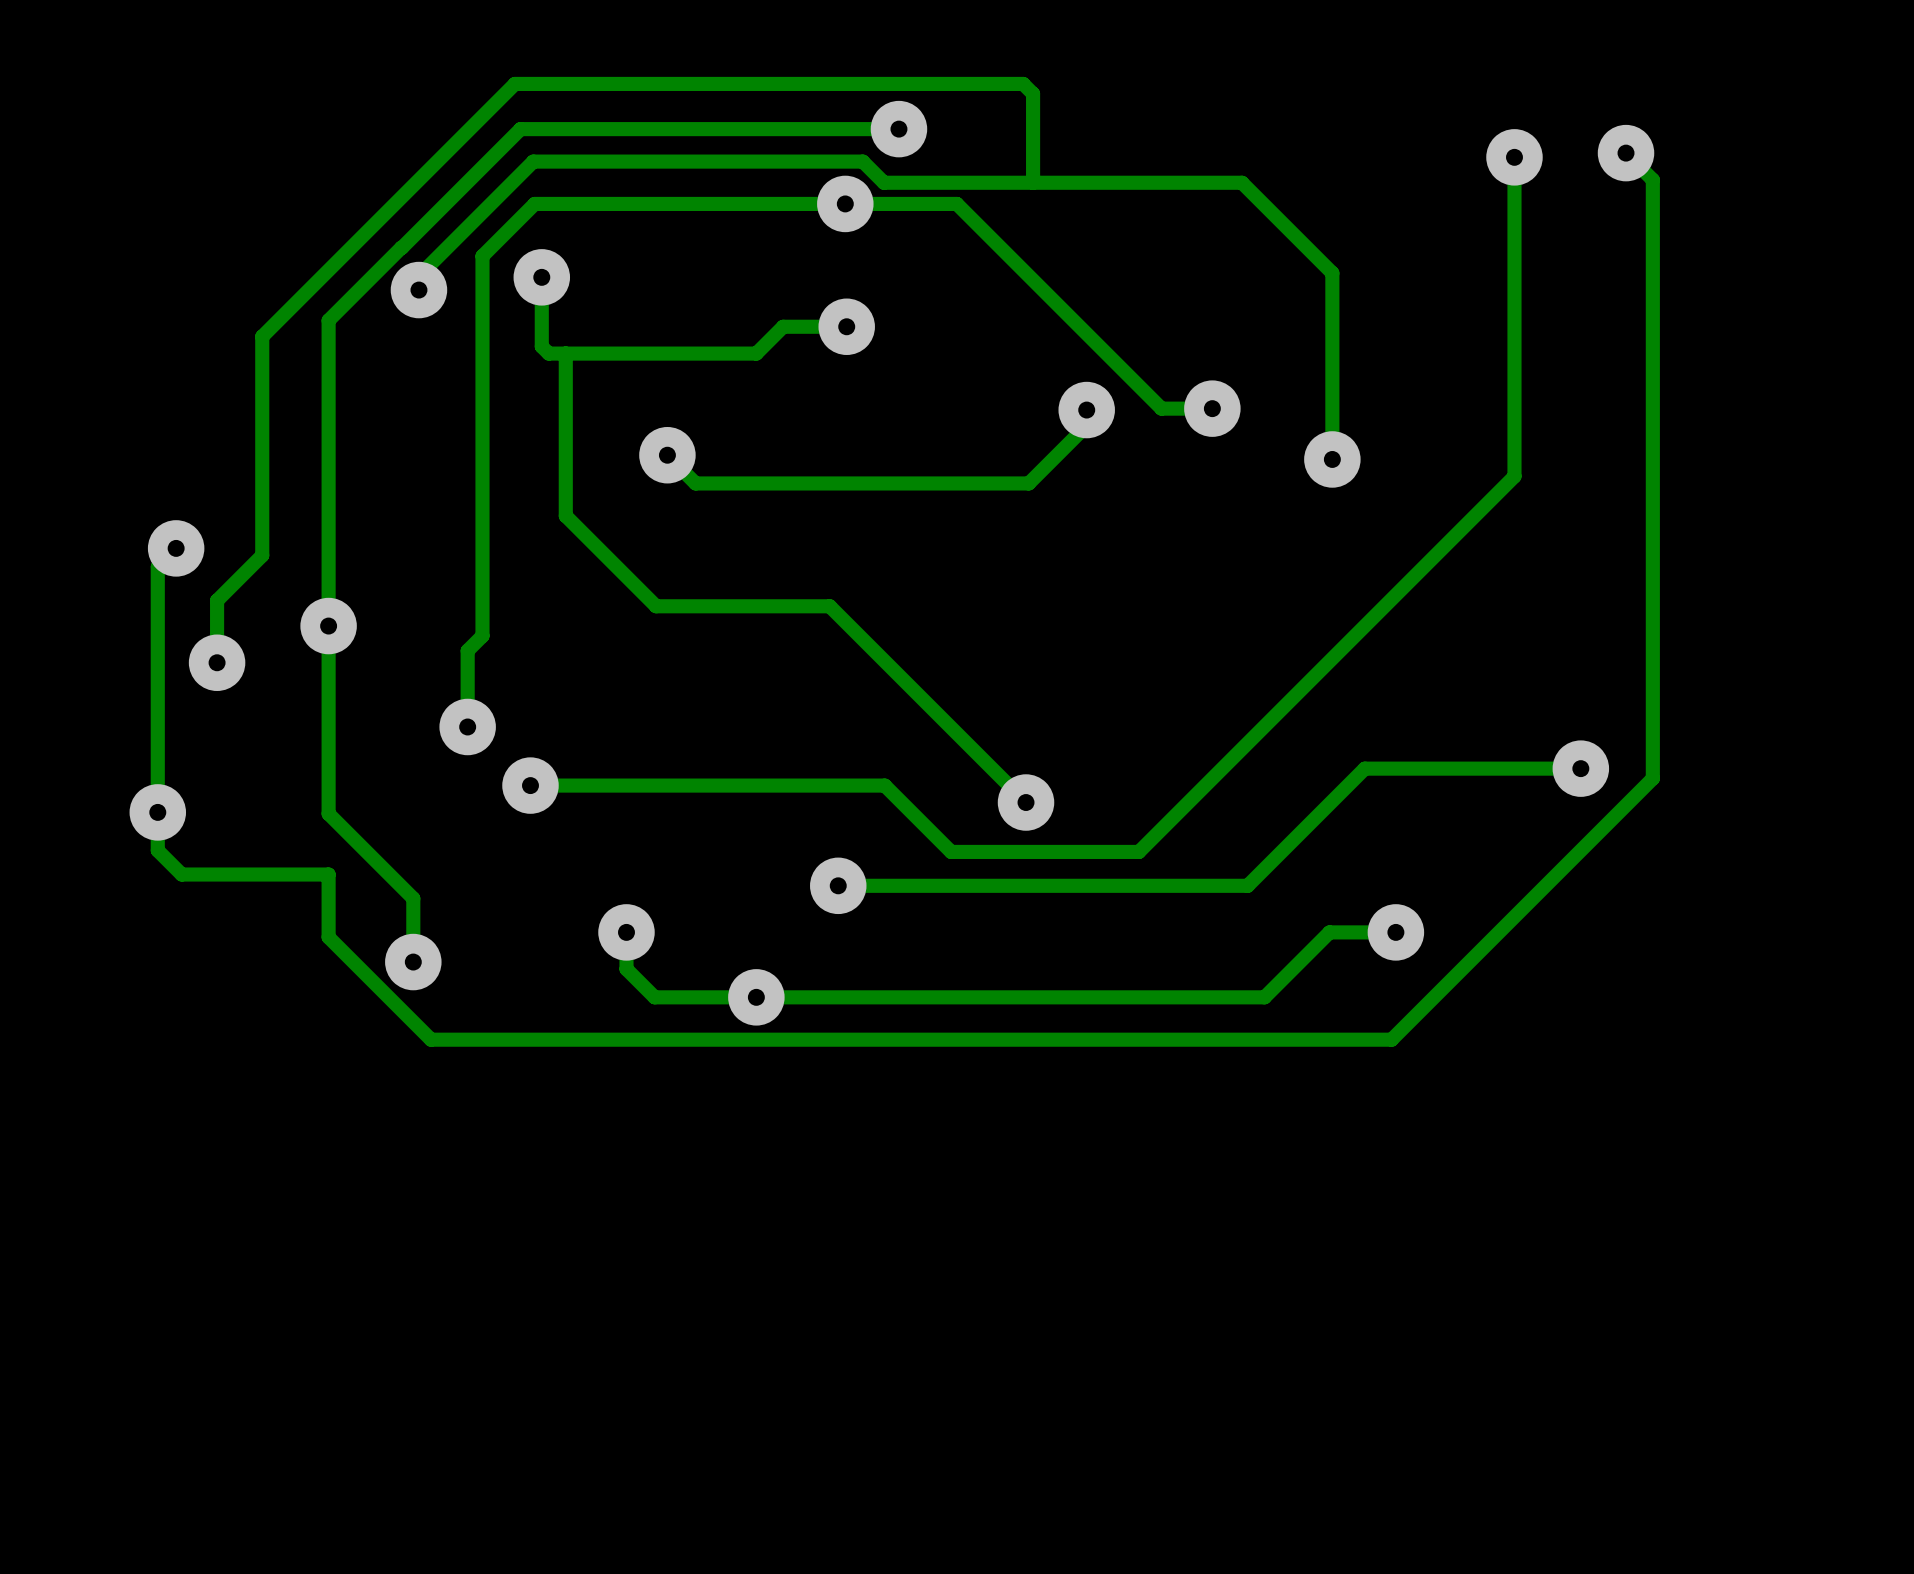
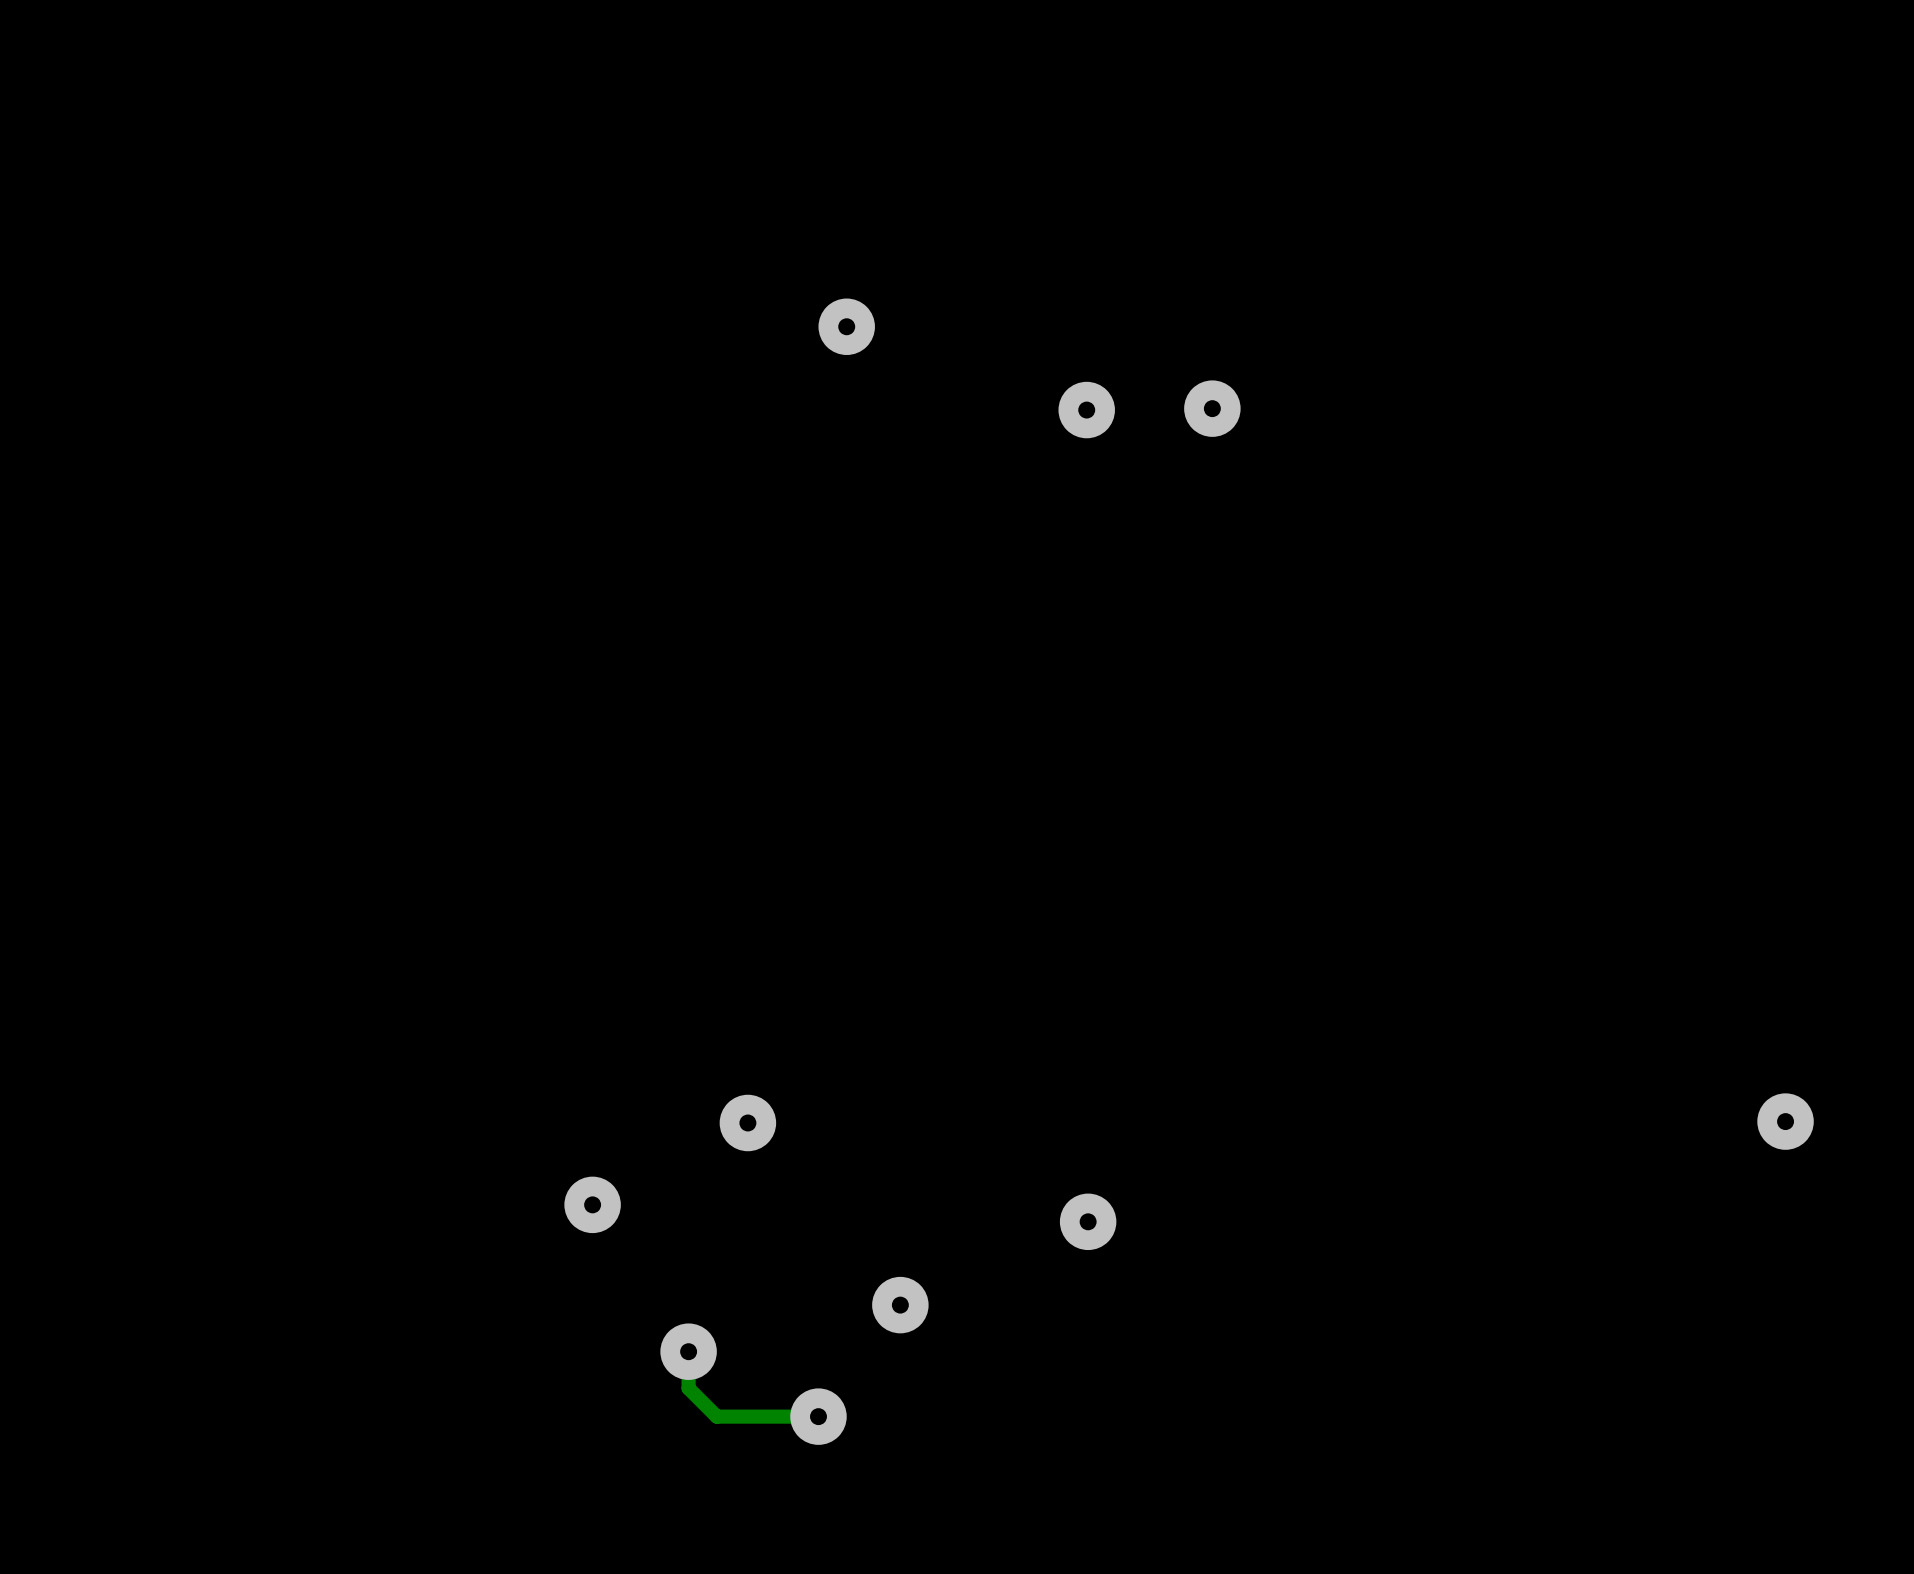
track: (898, 129) (520, 129) (328, 320) (328, 813) (413, 898) (413, 962) -> none
via: (898, 129) -> none
track: (1626, 153) (1652, 179) (1652, 778) (1391, 1039) (431, 1039) (328, 937) (328, 874) (181, 874) (157, 850) (157, 566) (176, 548) -> none
via: (1626, 153) -> none
track: (1514, 157) (1514, 476) (1138, 851) (951, 851) (884, 785) (530, 785) -> none
via: (1514, 157) -> none
track: (1033, 182) (1033, 93) (1023, 83) (514, 83) (262, 336) (262, 555) (217, 600) (217, 662) -> none
via: (845, 203) -> none
track: (541, 277) (541, 346) (548, 353) (756, 353) (783, 326) (846, 326) -> none
via: (541, 277) -> none
track: (418, 290) (418, 275) (533, 161) (862, 161) (884, 182) (1242, 182) (1332, 273) (1332, 459) -> none
via: (418, 290) -> none
track: (565, 353) (565, 515) (656, 606) (829, 606) (1026, 802) -> none
track: (1212, 408) (1161, 408) (956, 203) (534, 203) (482, 256) (482, 635) (467, 650) (467, 726) -> none
track: (1086, 410) (1086, 425) (1028, 483) (695, 483) (667, 455) -> none
via: (667, 455) -> none
via: (1332, 459) -> none
via: (176, 548) -> none
via: (328, 626) -> none
via: (217, 662) -> none
via: (467, 726) -> none
track: (1580, 768) (1364, 768) (1247, 885) (838, 885) -> none
via: (1580, 768) -> none
via: (530, 785) -> none
via: (1026, 802) -> none
via: (157, 812) -> none
via: (838, 885) -> none
via: (626, 932) -> none
track: (1395, 932) (1329, 932) (1264, 997) (654, 997) (626, 969) (626, 932) -> none
via: (1395, 932) -> none
via: (413, 962) -> none
via: (756, 997) -> none
via: none -> (1785, 1121)
via: none -> (747, 1122)
via: none -> (592, 1204)
via: none -> (1088, 1221)
via: none -> (900, 1305)
track: none -> (688, 1351) (688, 1388) (716, 1416) (818, 1416)
via: none -> (688, 1351)
via: none -> (818, 1416)

